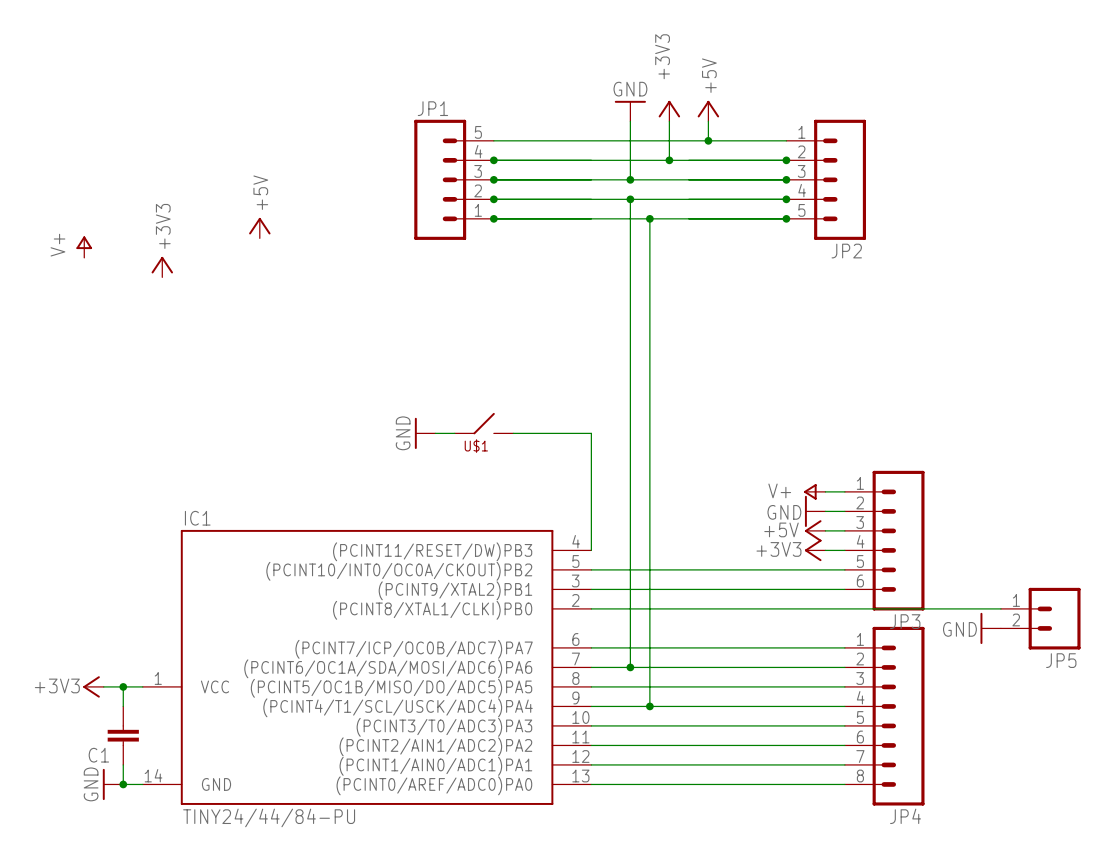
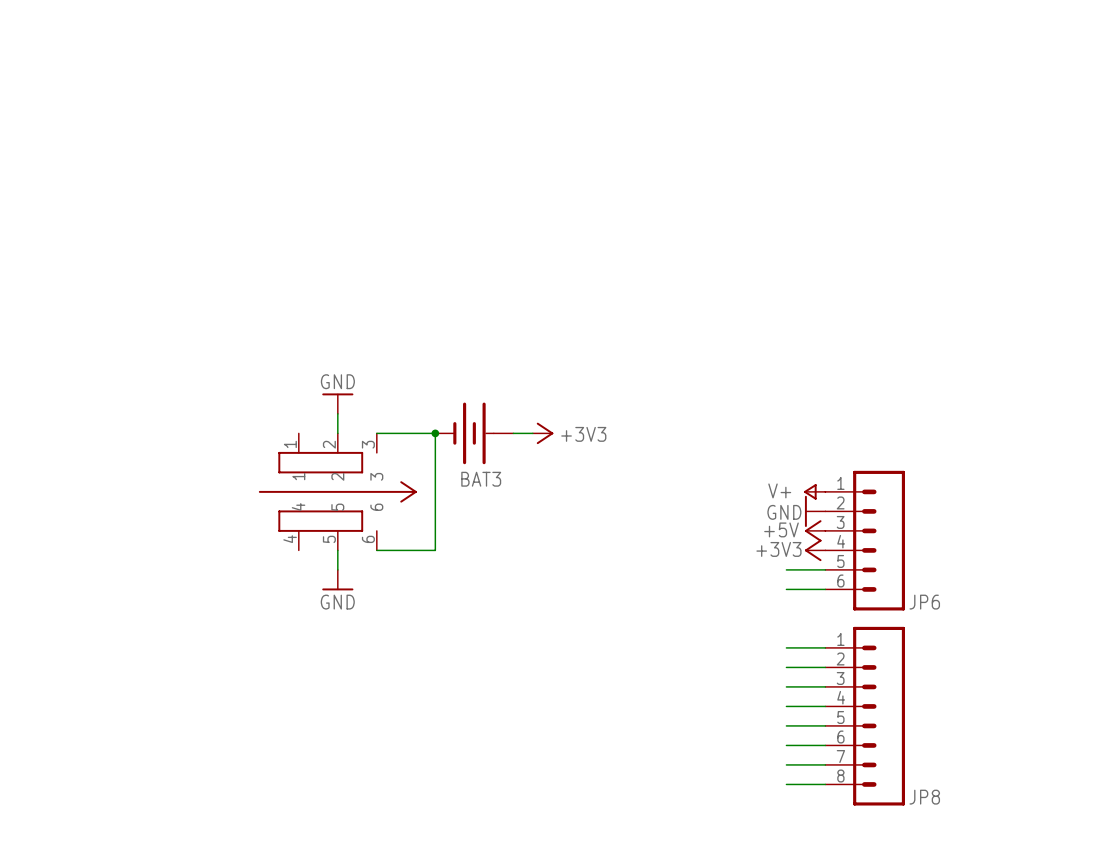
power symbol: GND (630, 111) -> none
power symbol: +3V3 (669, 111) -> none
power symbol: +5V (708, 111) -> none
wire: (630, 121) (630, 179) -> none
wire: (669, 121) (669, 160) -> none
wire: (708, 121) (708, 140) -> none
wire: (493, 140) (786, 140) -> none
junction: (708, 140) -> none
wire: (493, 160) (786, 160) -> none
junction: (493, 160) -> none
junction: (669, 160) -> none
junction: (786, 160) -> none
JP1: (454, 179) -> none
wire: (493, 179) (786, 179) -> none
junction: (493, 179) -> none
junction: (630, 179) -> none
junction: (786, 179) -> none
JP2: (826, 179) -> none
wire: (493, 199) (786, 199) -> none
junction: (493, 199) -> none
wire: (630, 199) (630, 667) -> none
junction: (630, 199) -> none
junction: (786, 199) -> none
wire: (493, 218) (786, 218) -> none
junction: (493, 218) -> none
wire: (649, 218) (649, 706) -> none
junction: (649, 218) -> none
junction: (786, 218) -> none
power symbol: +5V (259, 228) -> none
power symbol: V+ (84, 247) -> none
power symbol: +3V3 (162, 267) -> none
power symbol: none -> GND (337, 403)
wire: none -> (337, 413) (337, 433)
U$1: (484, 423) -> none
wire: none -> (376, 433) (435, 433) (435, 550) (376, 550)
power symbol: GND (425, 433) -> none
junction: none -> (435, 433)
BAT3: none -> (474, 433)
wire: (532, 433) (591, 433) (591, 550) -> none
power symbol: none -> +3V3 (543, 433)
part: none -> (337, 491)
JP6: none -> (865, 540)
JP3: (884, 540) -> none
wire: none -> (337, 550) (337, 569)
wire: (591, 569) (786, 569) -> none
power symbol: none -> GND (337, 580)
wire: (591, 589) (786, 589) -> none
wire: (591, 608) (1000, 608) -> none
JP5: (1040, 618) -> none
power symbol: GND (990, 628) -> none
wire: (591, 647) (786, 647) -> none
IC1: TINY24/44/84-PU (367, 667) -> none
wire: (591, 667) (786, 667) -> none
junction: (630, 667) -> none
power symbol: +3V3 (93, 686) -> none
wire: (103, 686) (142, 686) -> none
wire: (123, 686) (123, 706) -> none
junction: (123, 686) -> none
wire: (591, 686) (786, 686) -> none
wire: (591, 706) (786, 706) -> none
junction: (649, 706) -> none
JP8: none -> (865, 716)
JP4: (884, 716) -> none
wire: (591, 725) (786, 725) -> none
C1: (123, 735) -> none
wire: (591, 745) (786, 745) -> none
wire: (123, 764) (123, 784) (142, 784) -> none
wire: (591, 764) (786, 764) -> none
power symbol: GND (113, 784) -> none
junction: (123, 784) -> none
wire: (591, 784) (786, 784) -> none

